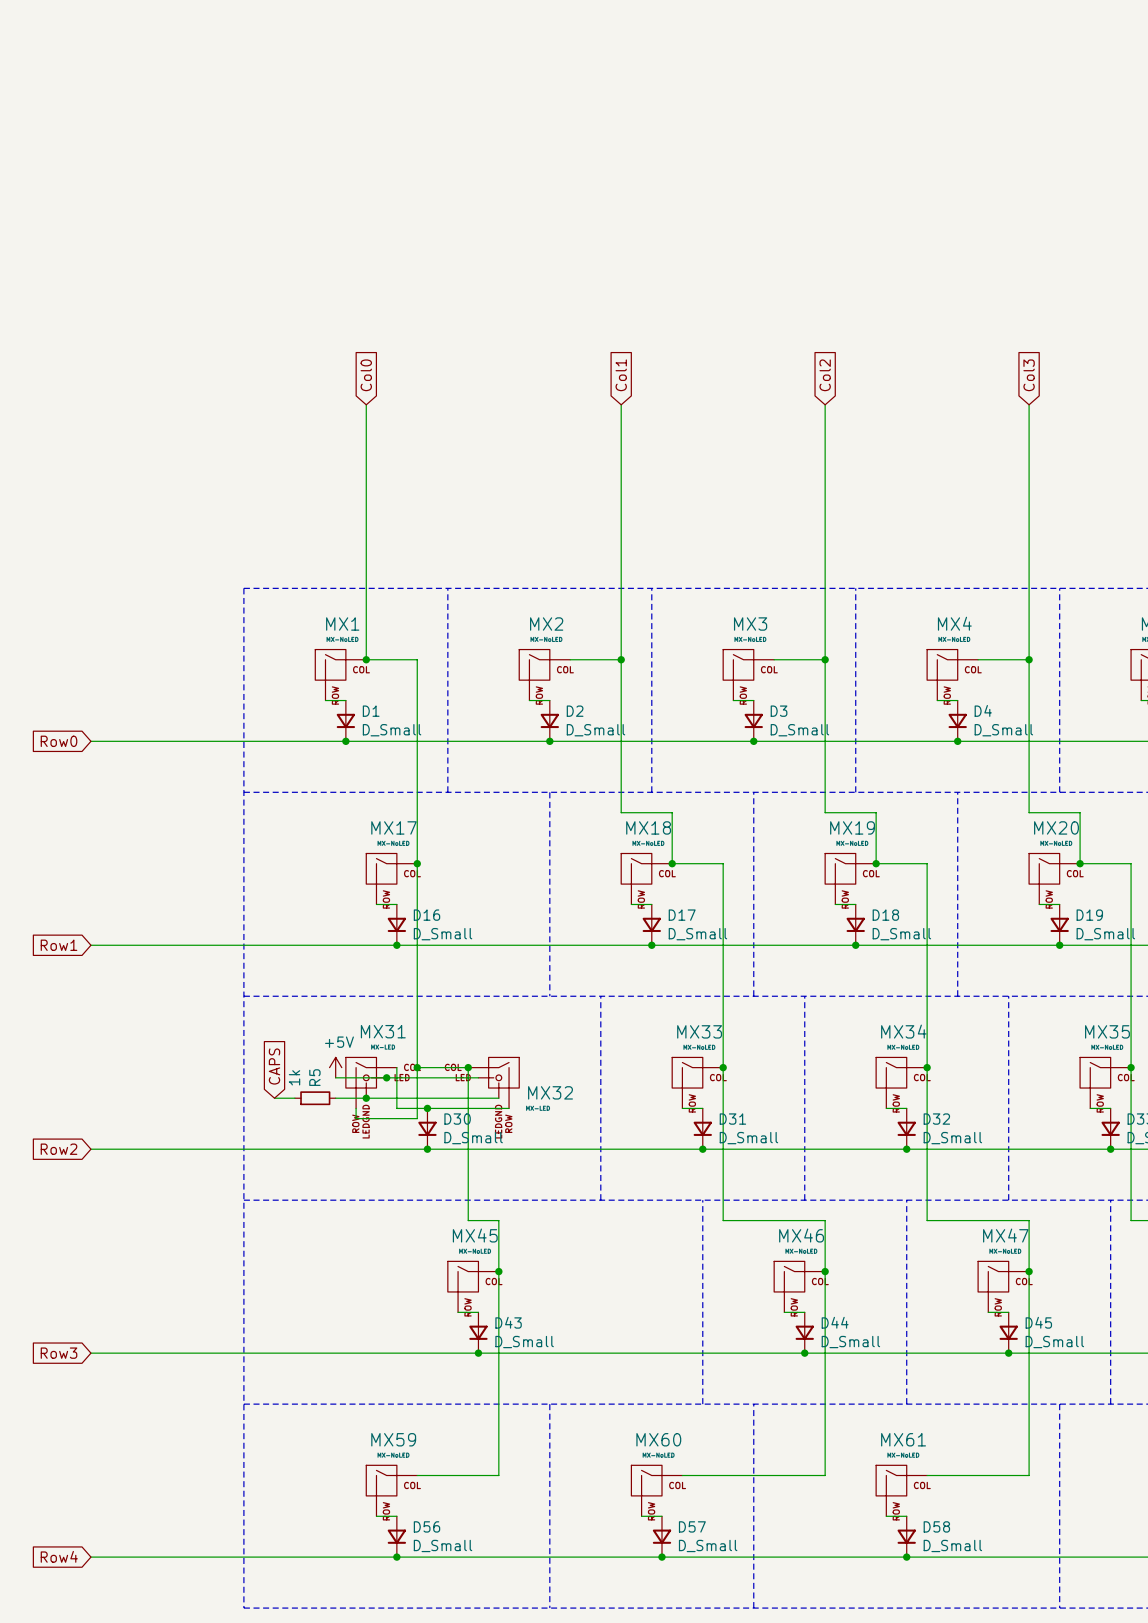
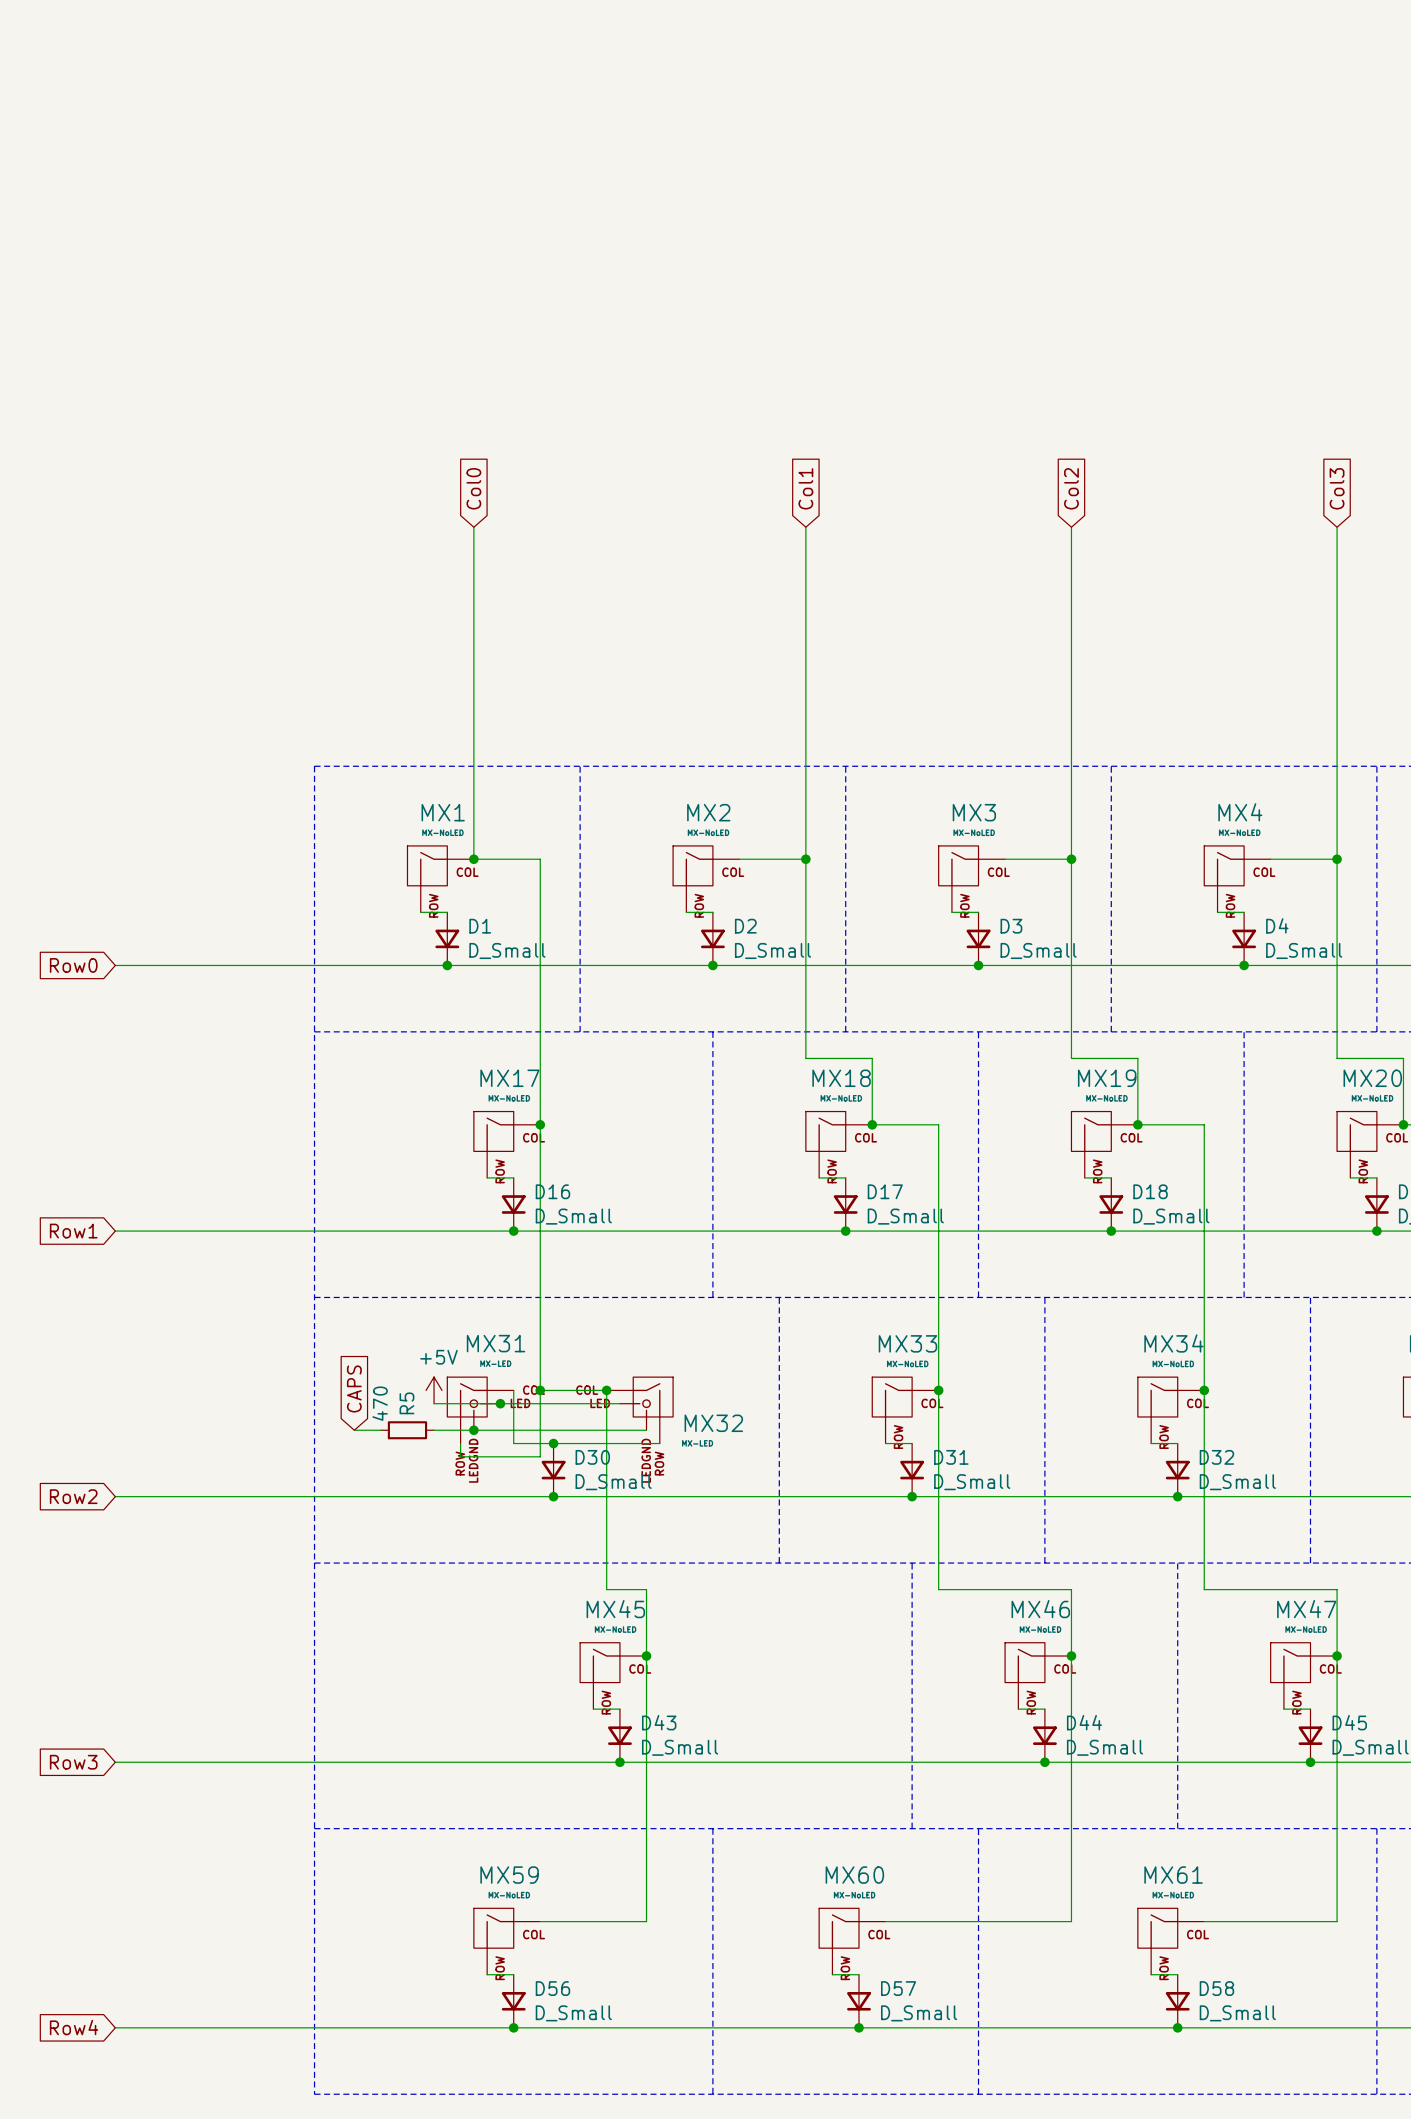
R5 value: 1k (294, 1077) -> 470 (380, 1403)

